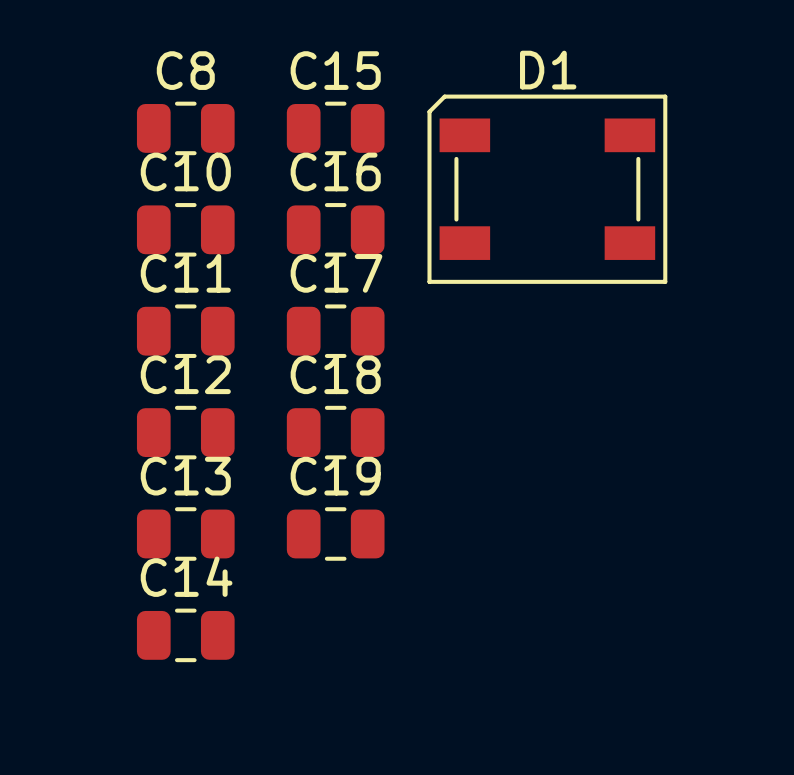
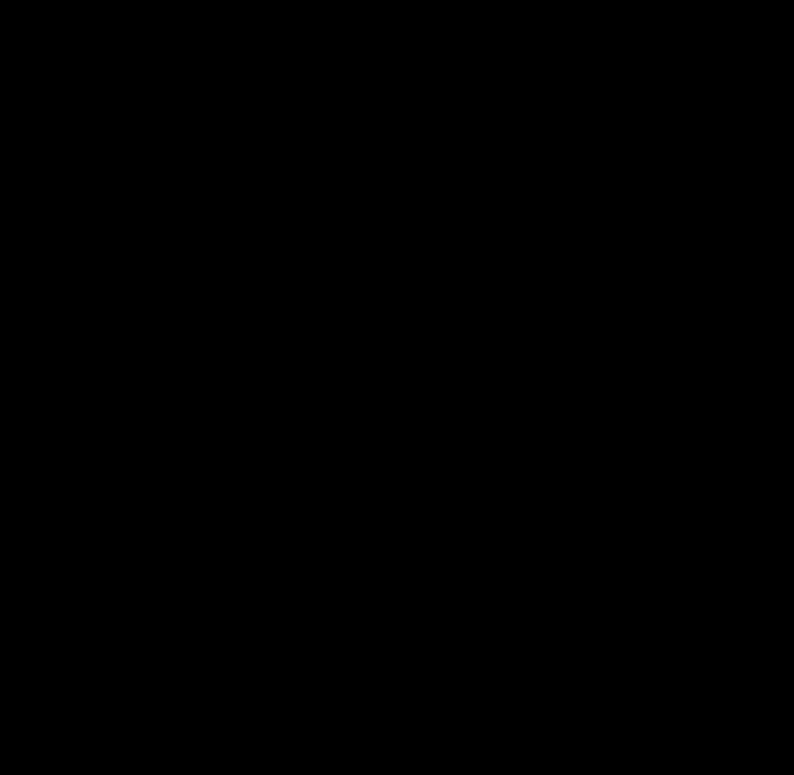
C8: (185, 128) -> none
C15: (335, 128) -> none
D1: (547, 189) -> none
C10: (185, 229) -> none
C16: (335, 229) -> none
C11: (185, 331) -> none
C17: (335, 331) -> none
C12: (185, 432) -> none
C18: (335, 432) -> none
C13: (185, 533) -> none
C19: (335, 533) -> none
C14: (185, 635) -> none

